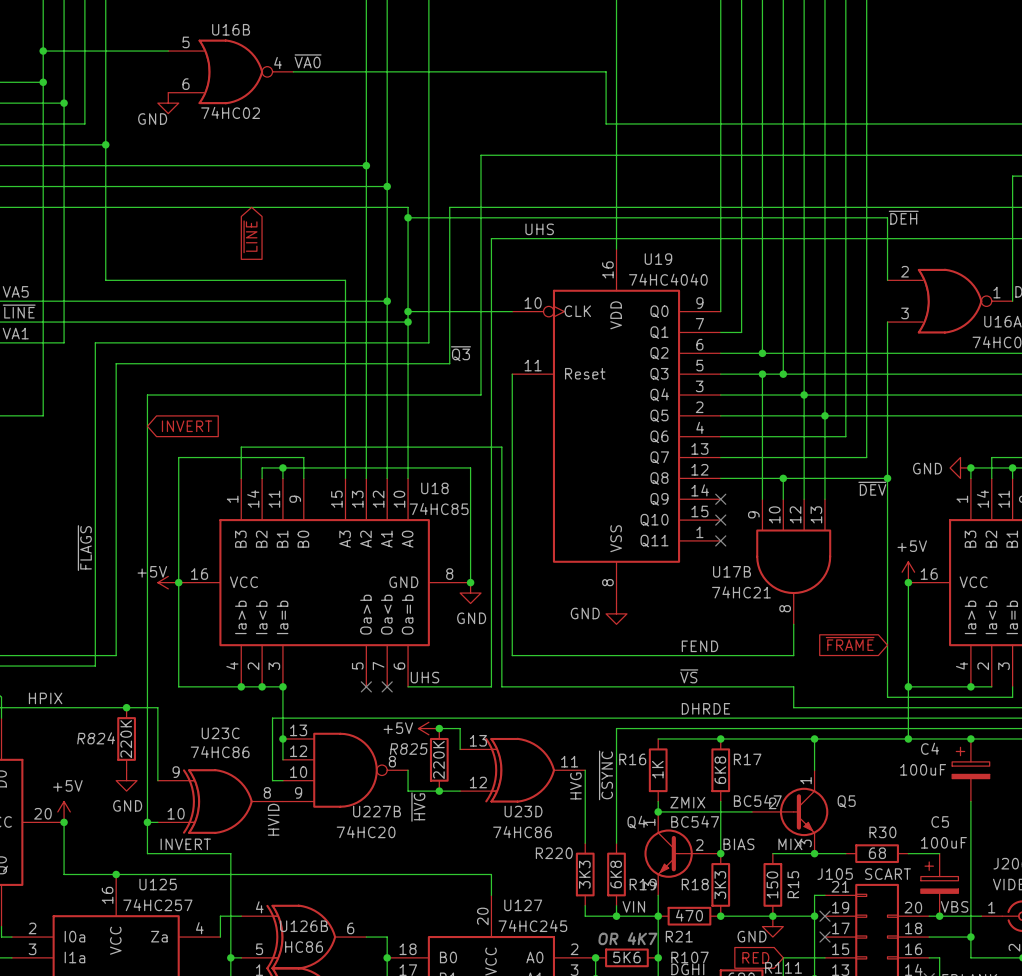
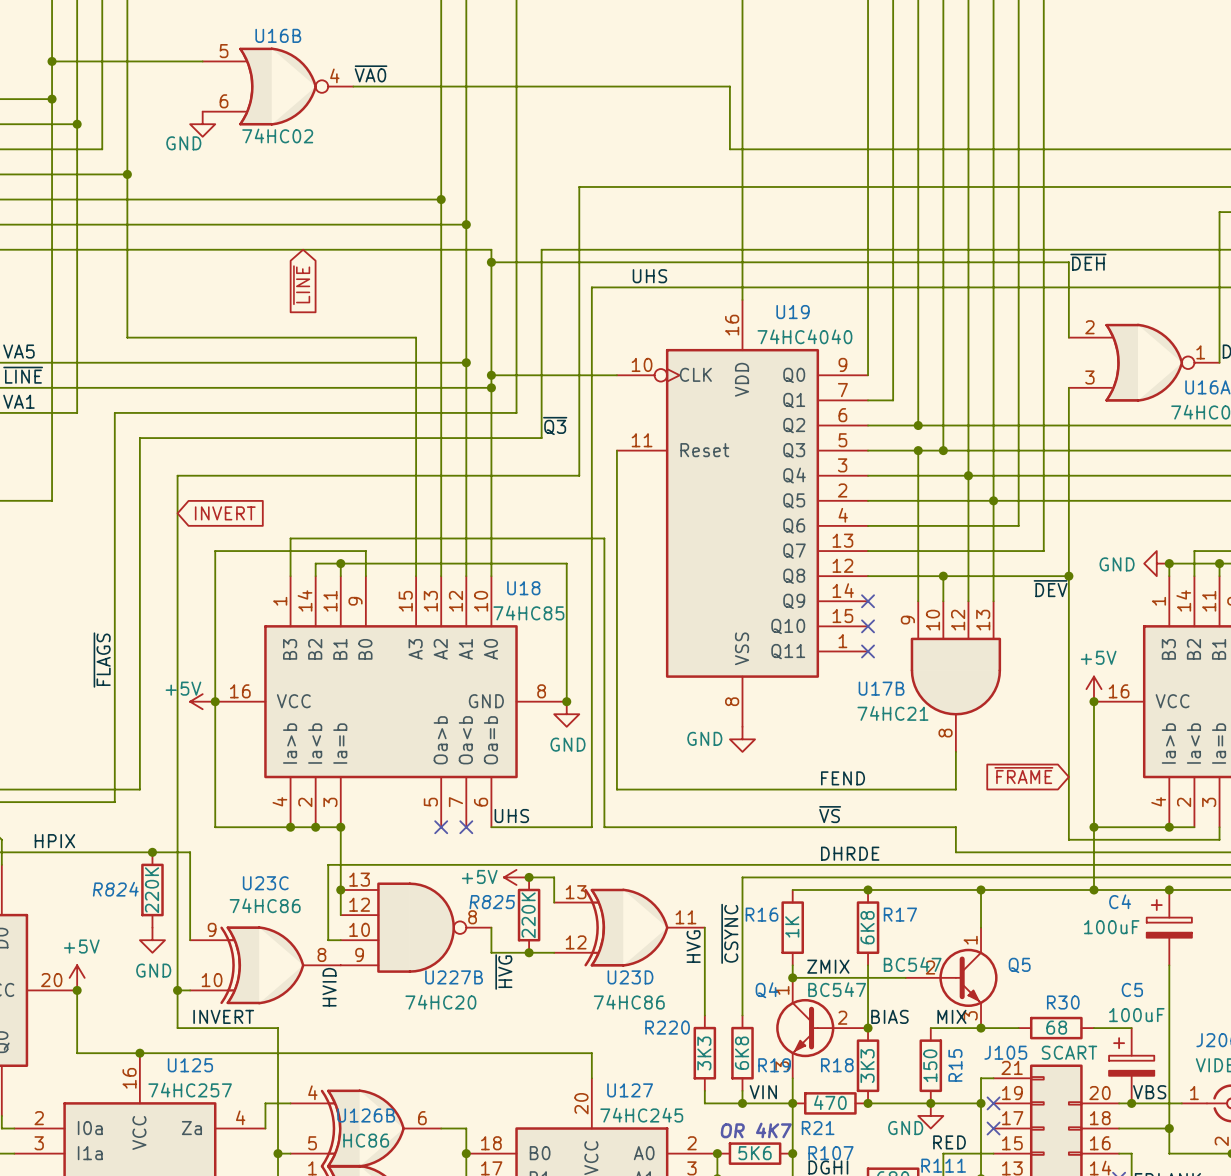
label: none -> RED (949, 1142)
global label: RED (755, 957) -> none

